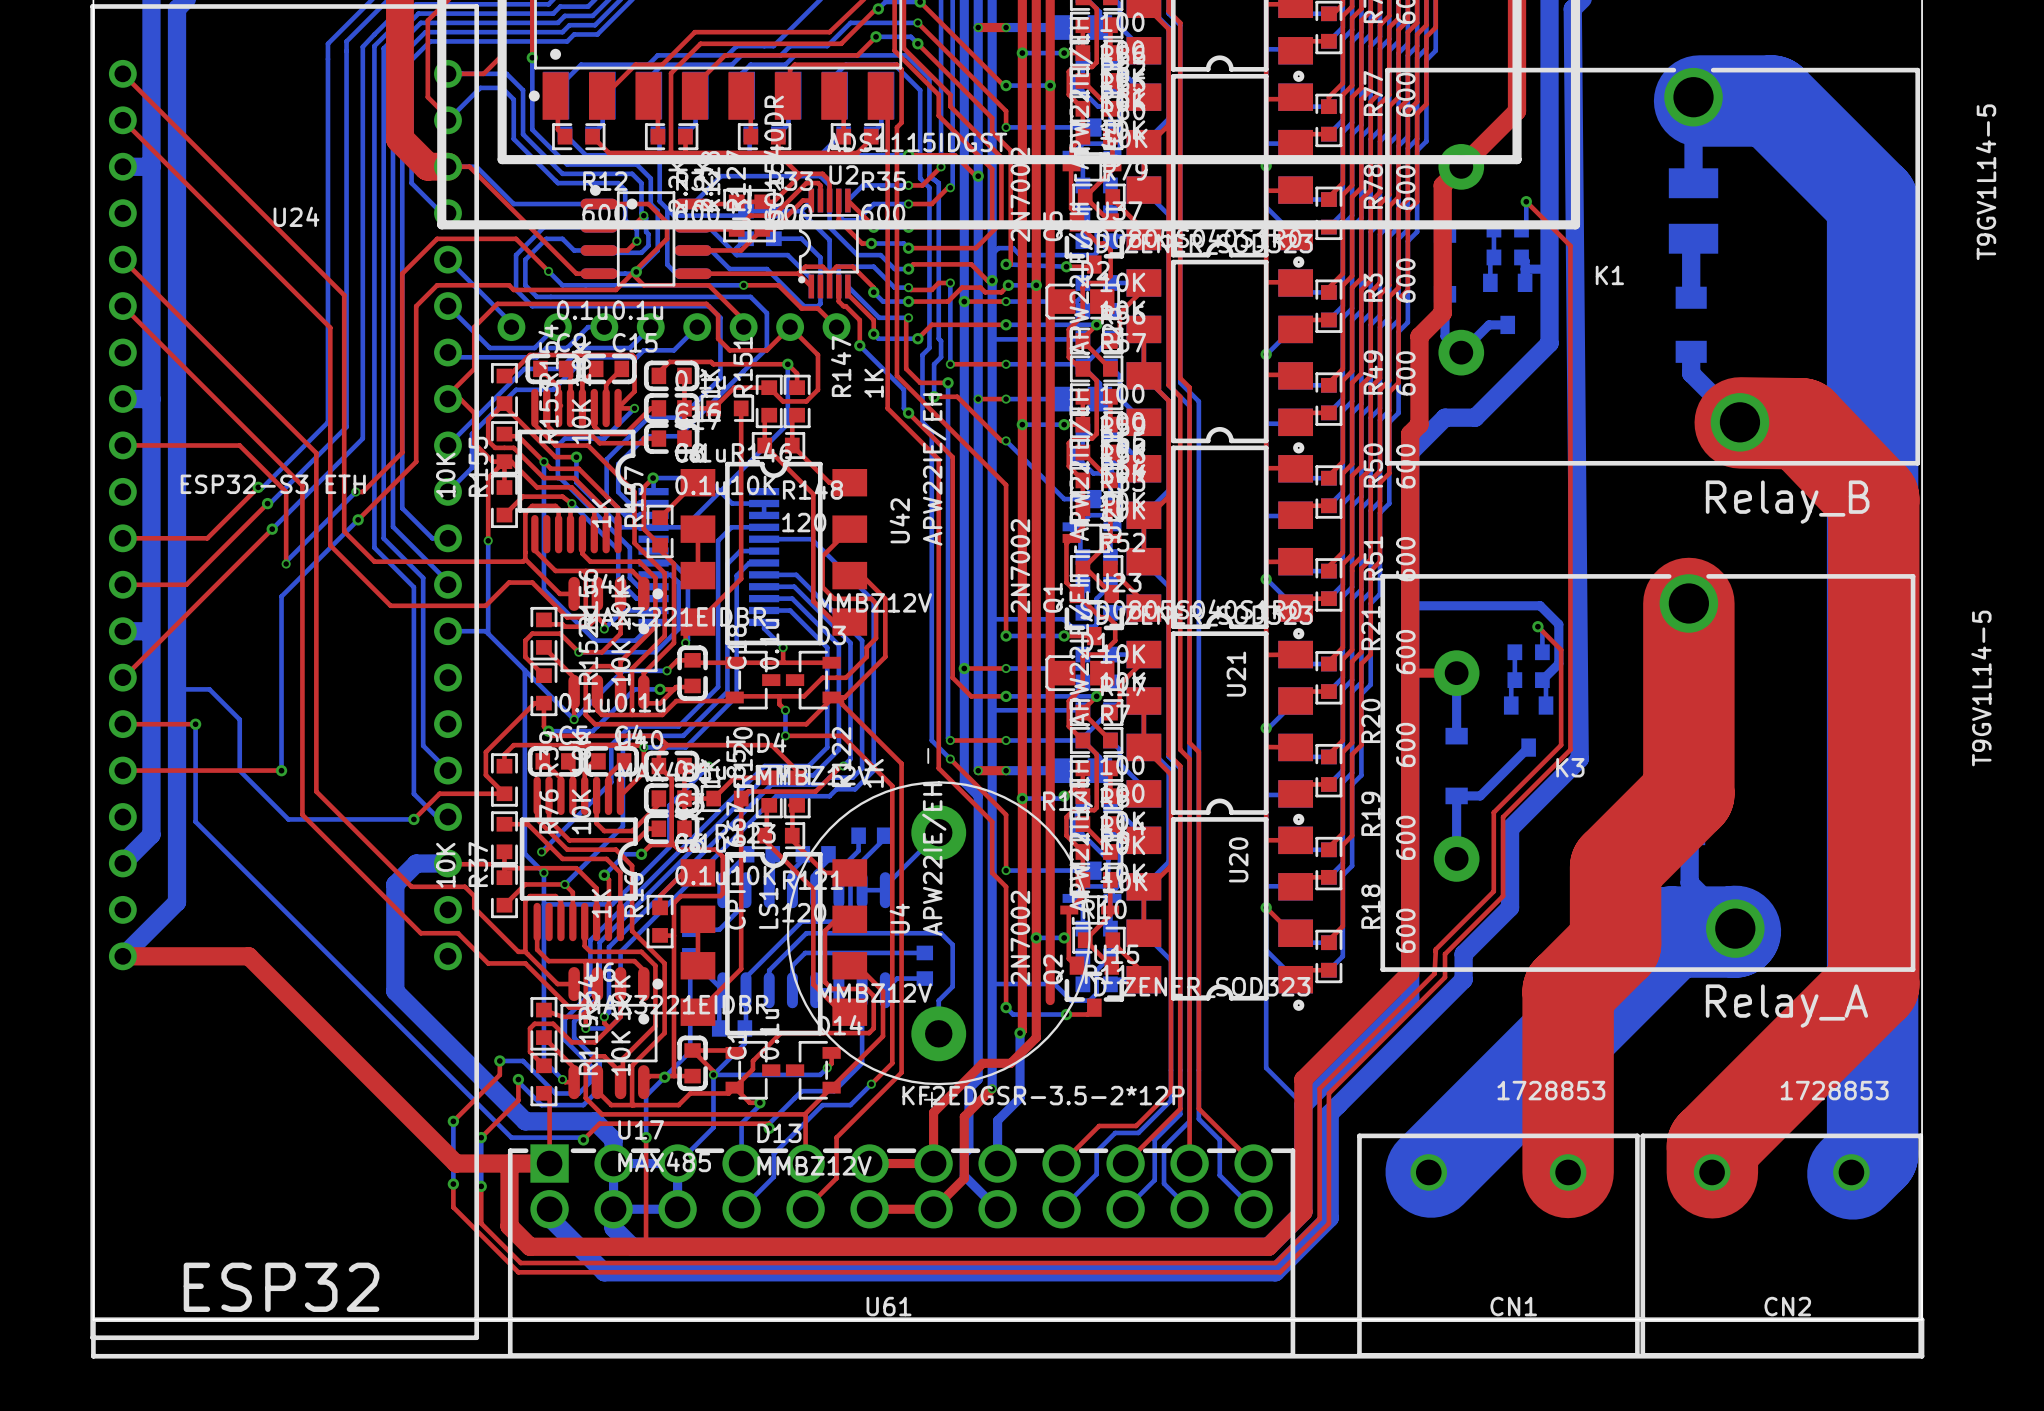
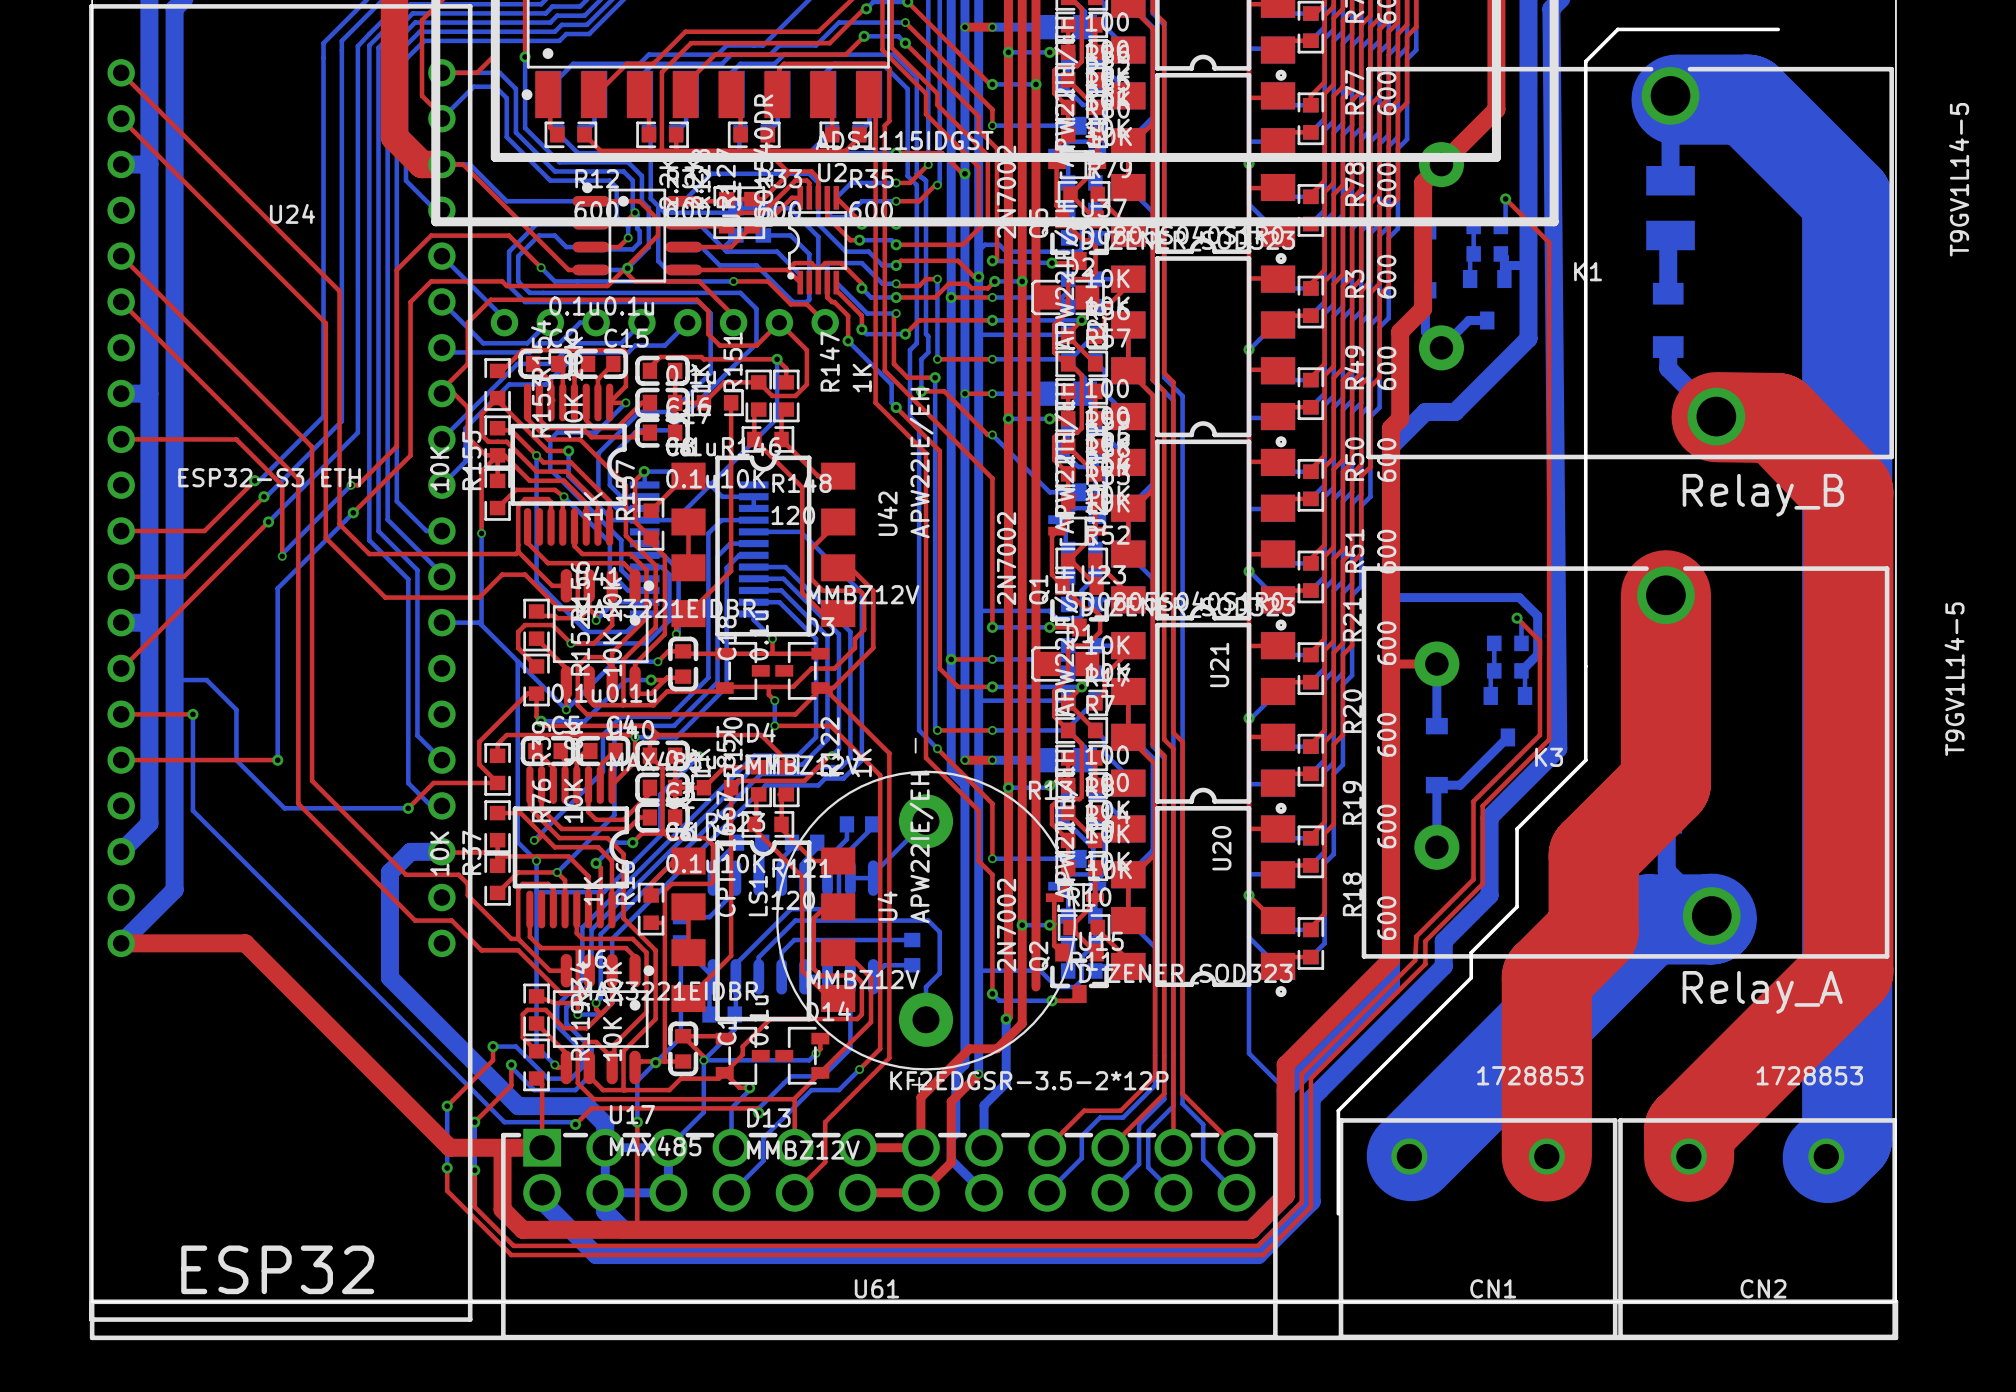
board edge: none -> (1778, 29) (1617, 29) (1585, 61) (1585, 760) (1517, 828) (1517, 906) (1471, 952) (1471, 977) (1338, 1110) (1338, 1213)

